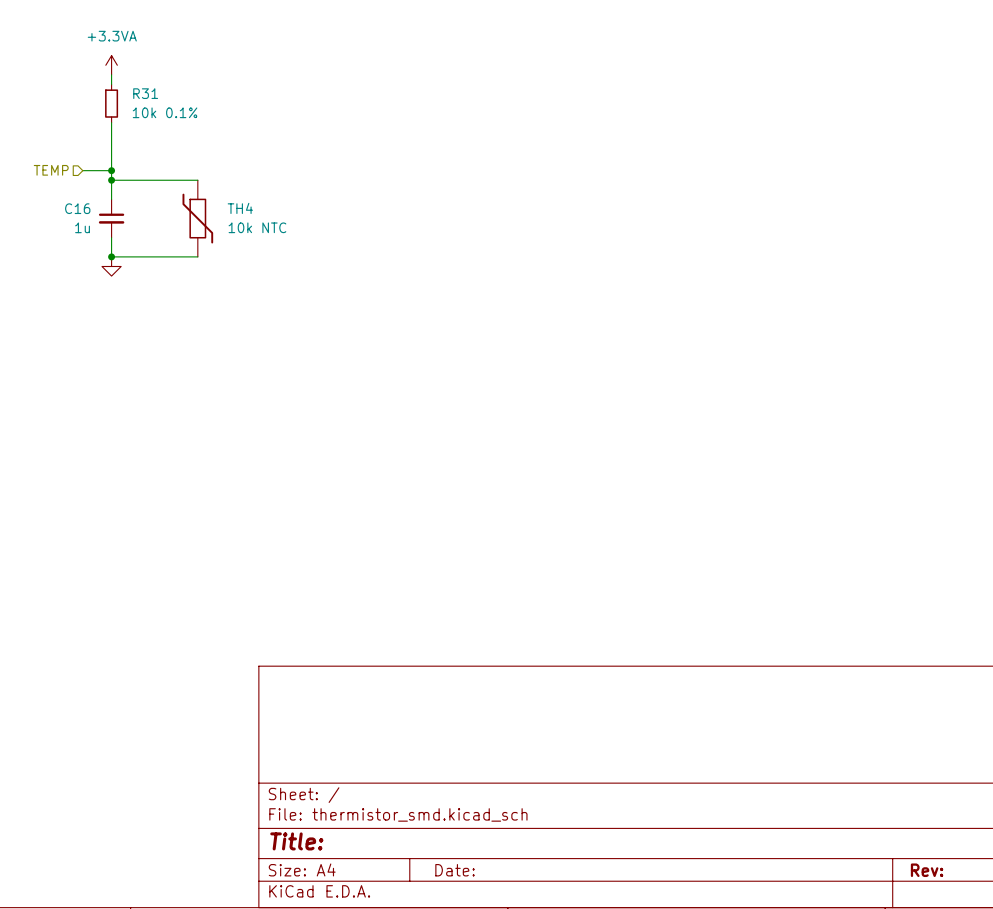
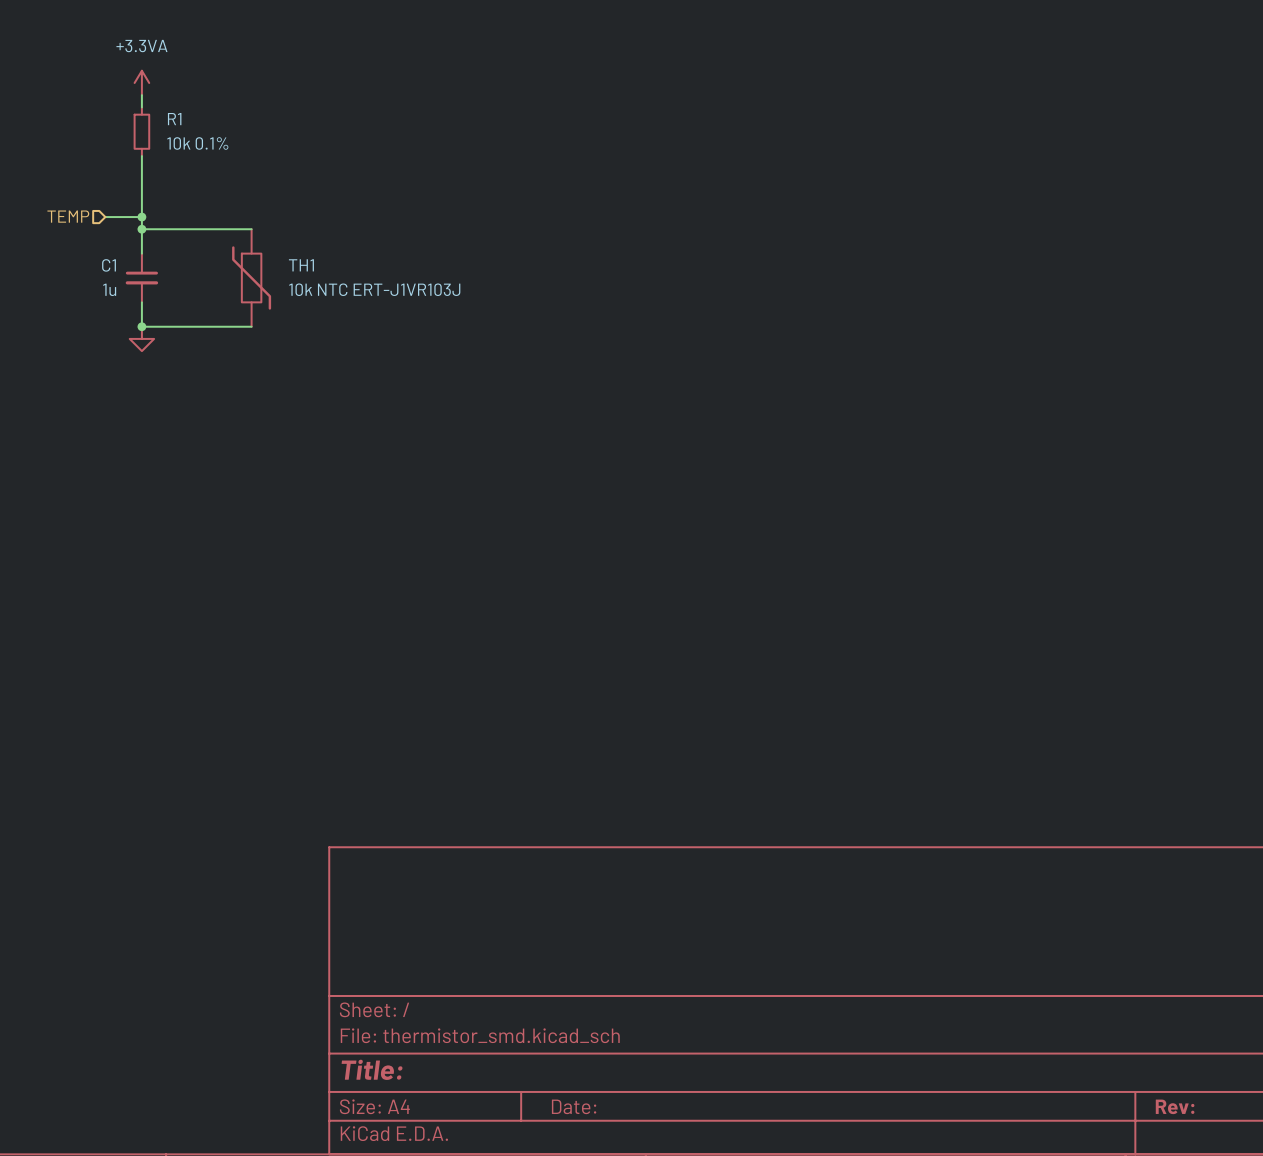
R31 name: R31 (145, 93) -> R1 (174, 119)
C16 name: C16 (77, 208) -> C1 (109, 265)
TH4 name: TH4 (240, 208) -> TH1 (301, 265)
TH4 value: 10k NTC (257, 227) -> 10k NTC ERT-J1VR103J (374, 289)

